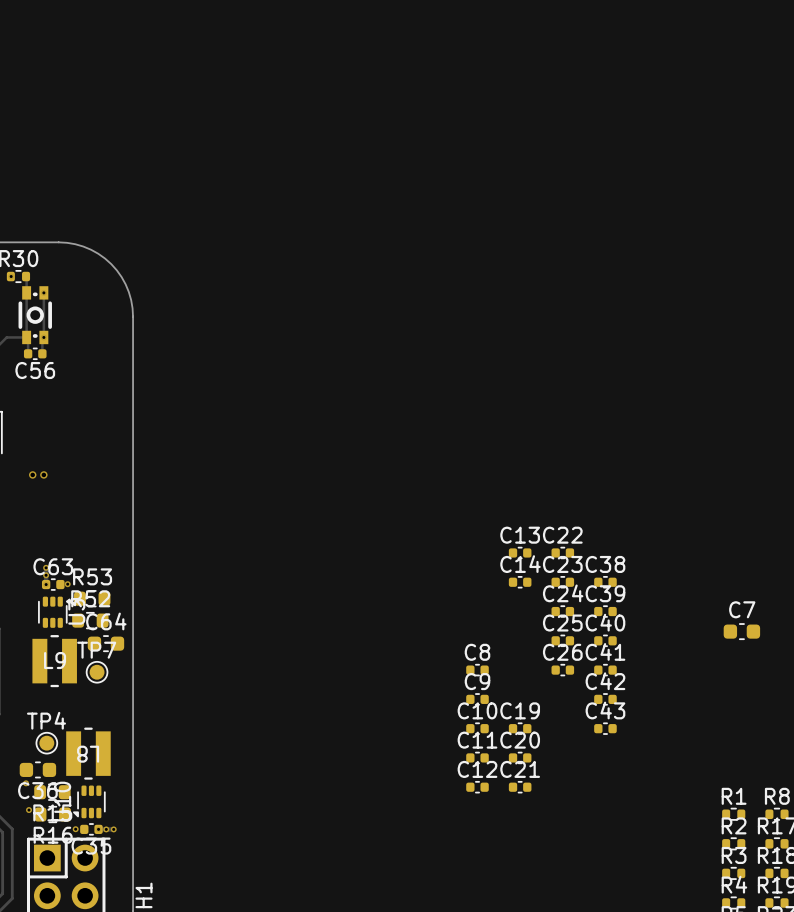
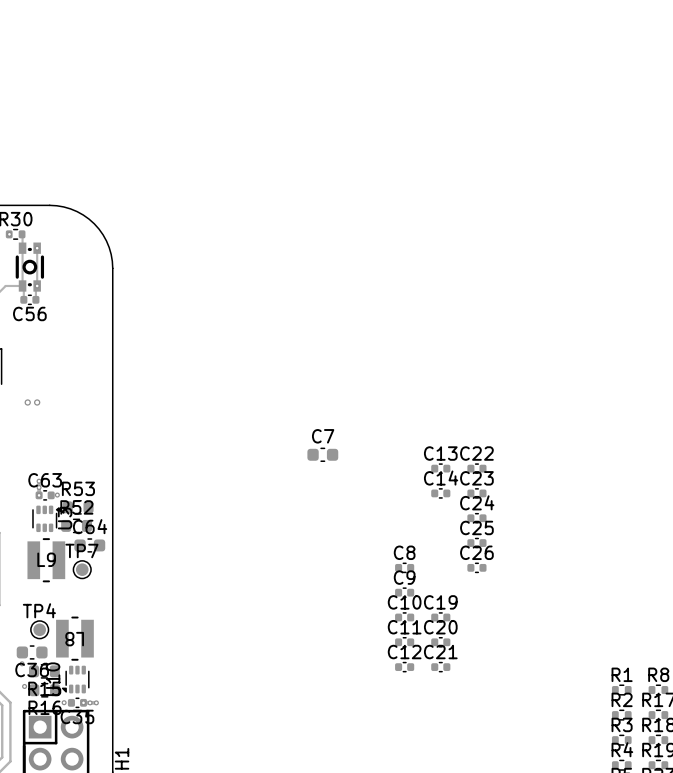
C38: (605, 582) -> none
C39: (605, 611) -> none
C7 position: (741, 631) -> (322, 454)
C40: (605, 640) -> none
C41: (605, 670) -> none
C42: (605, 699) -> none
C43: (605, 728) -> none

